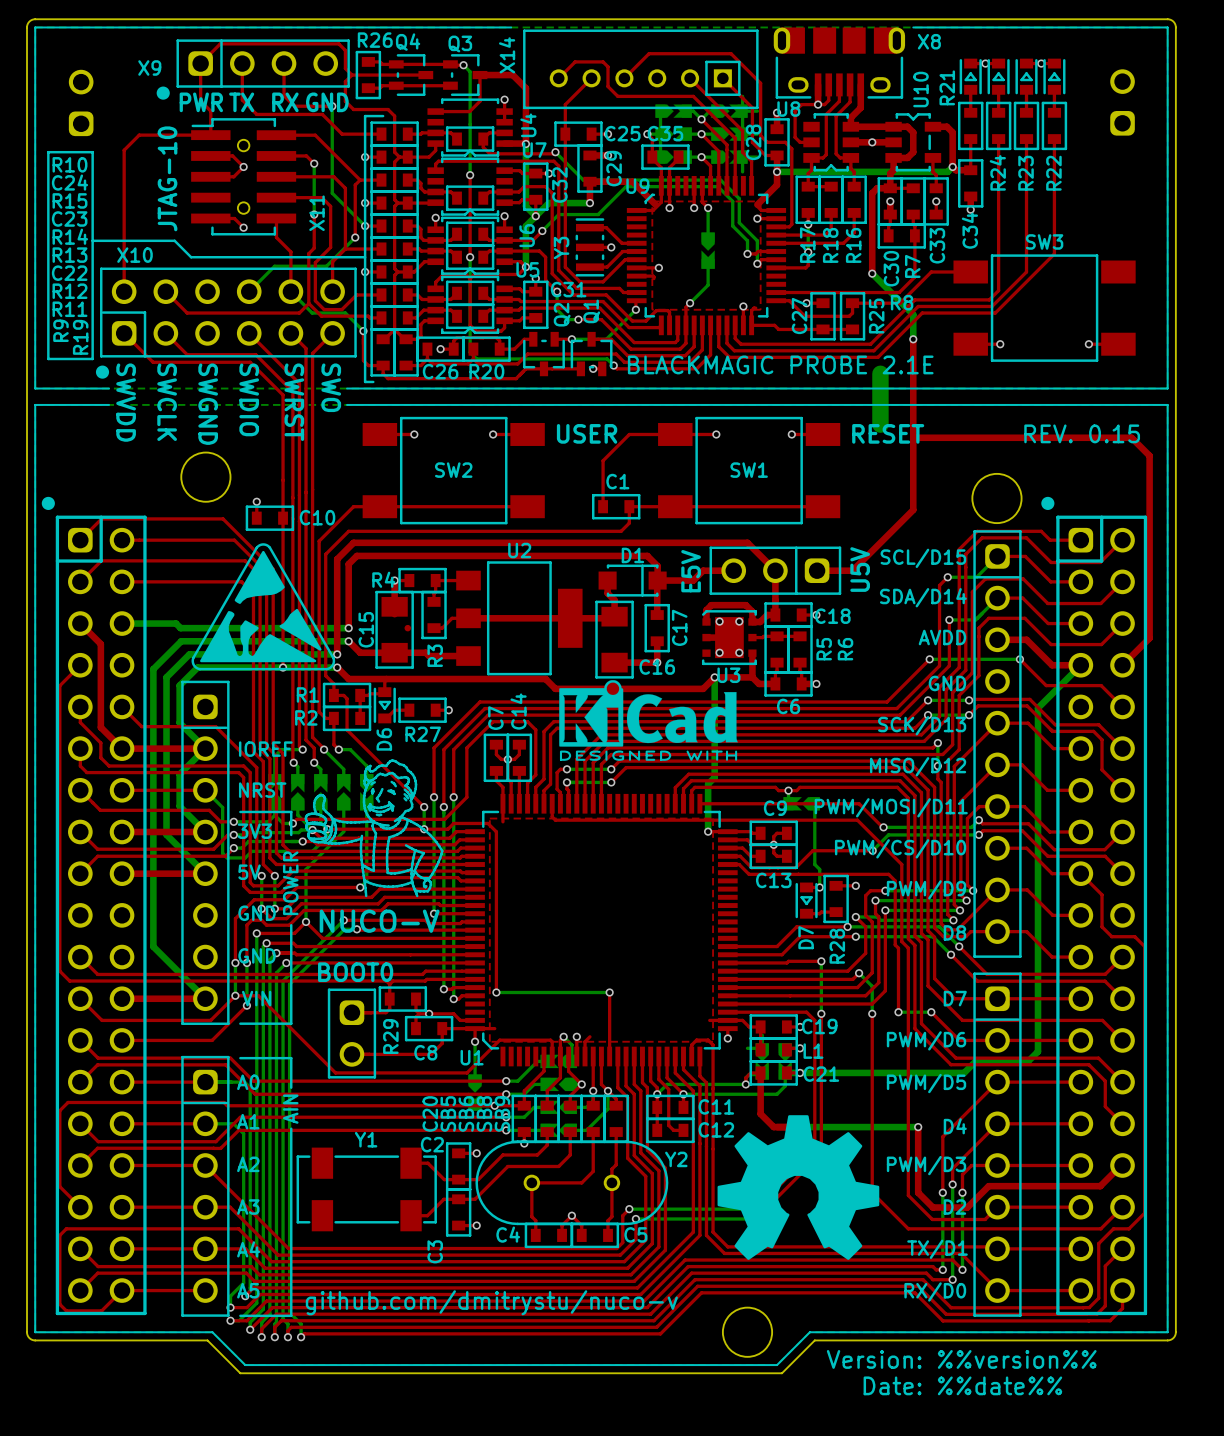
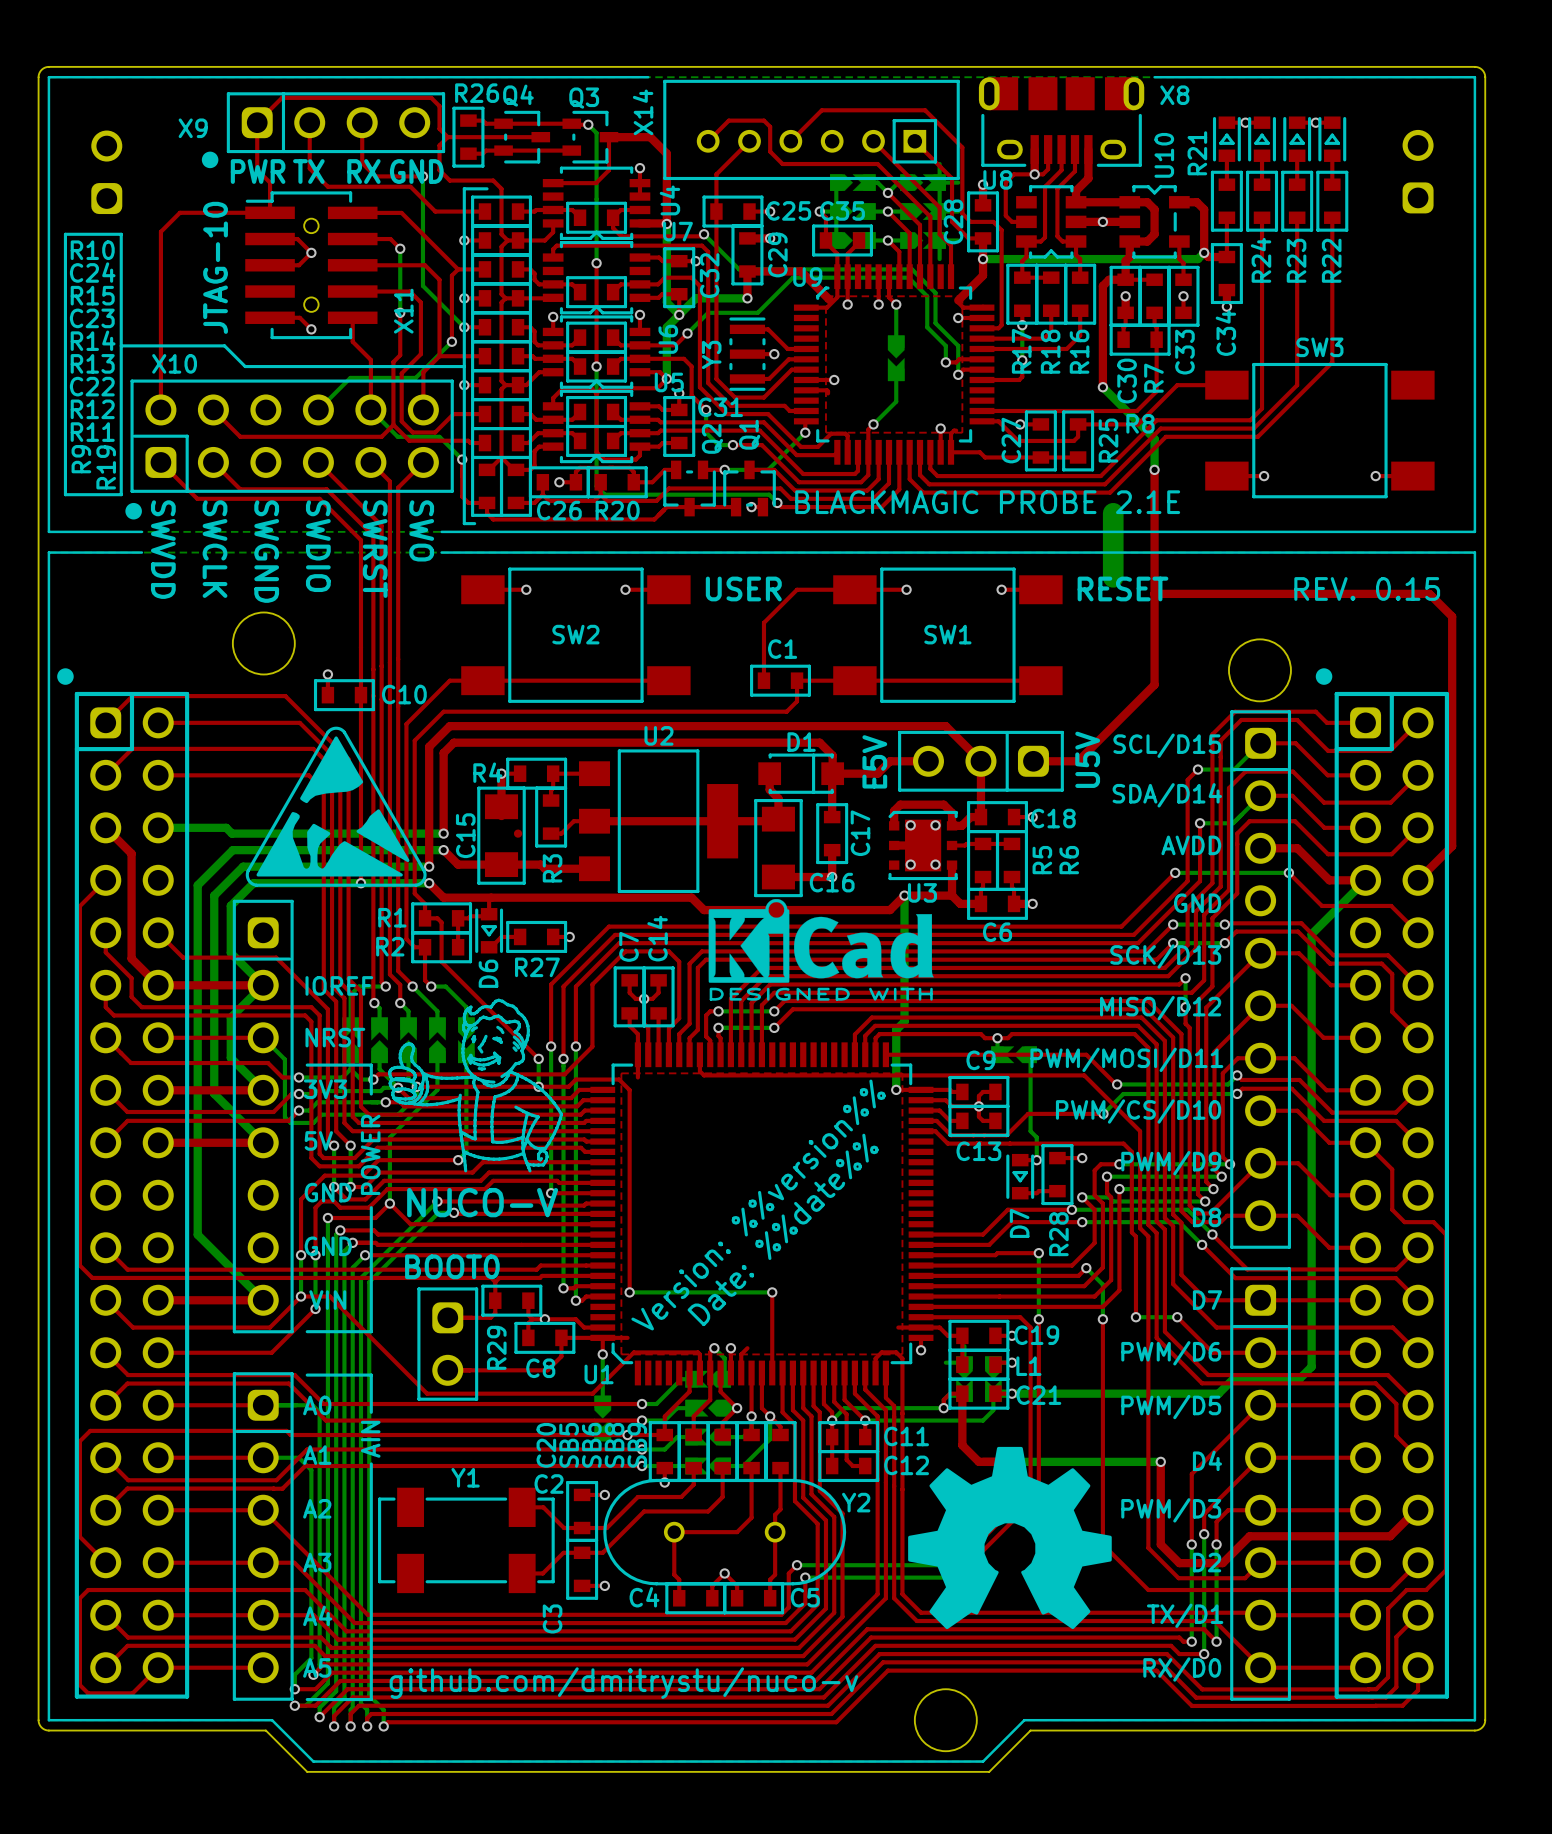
text: none -> Version: %%version%% (758, 1205)
text: none -> Date: %%date%% (783, 1229)
text: Version: %%version%% (961, 1359) -> none
text: Date: %%date%% (962, 1385) -> none

